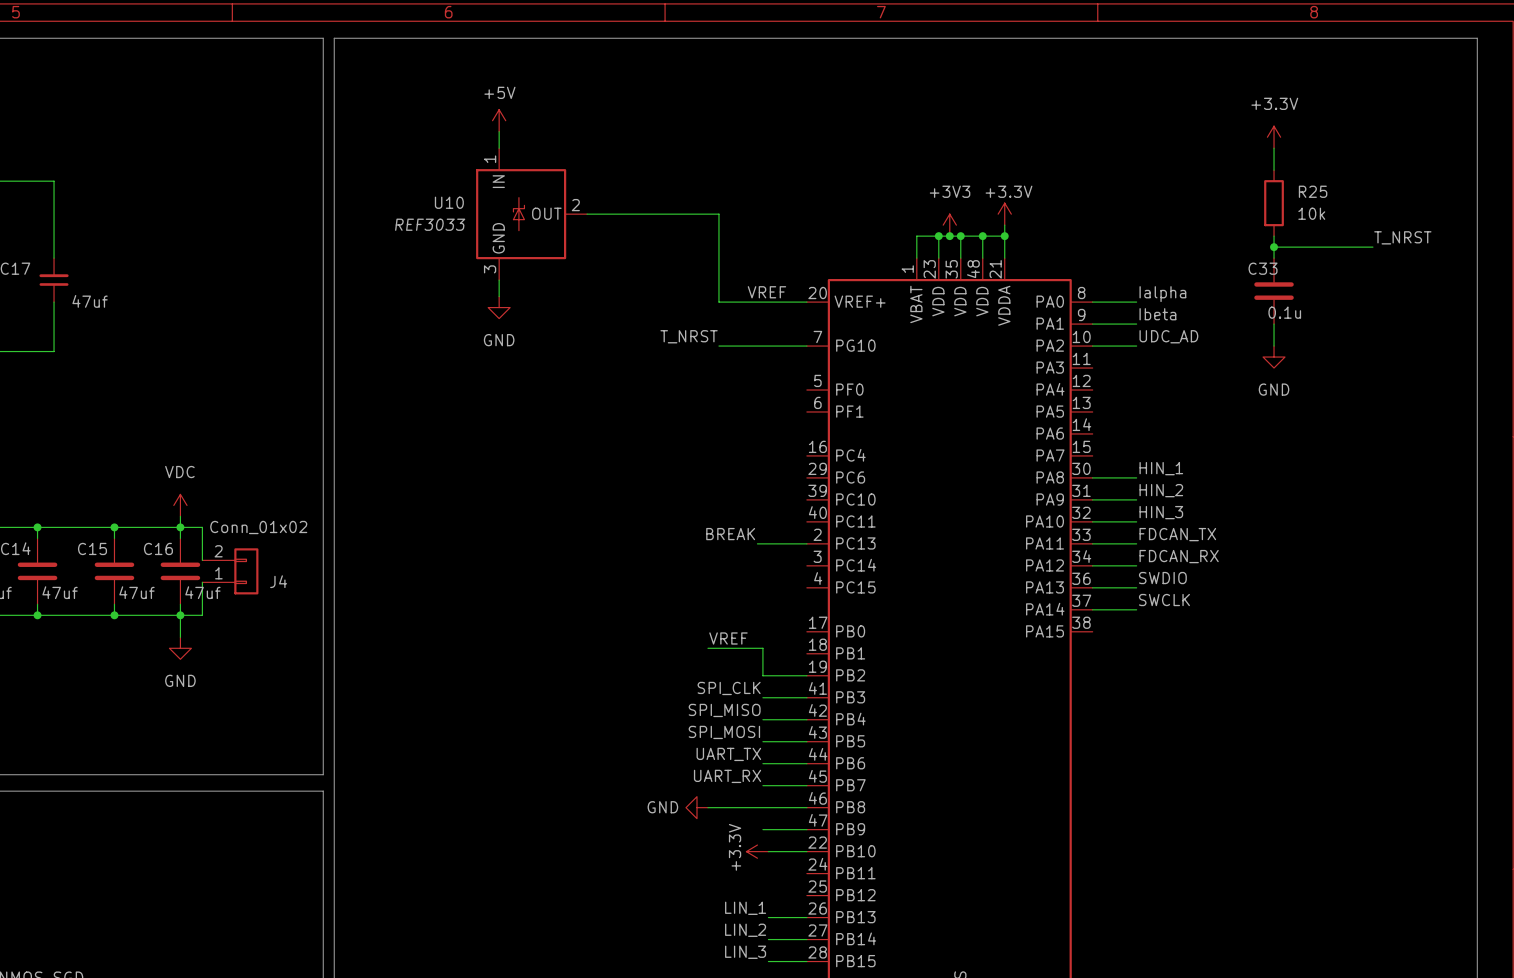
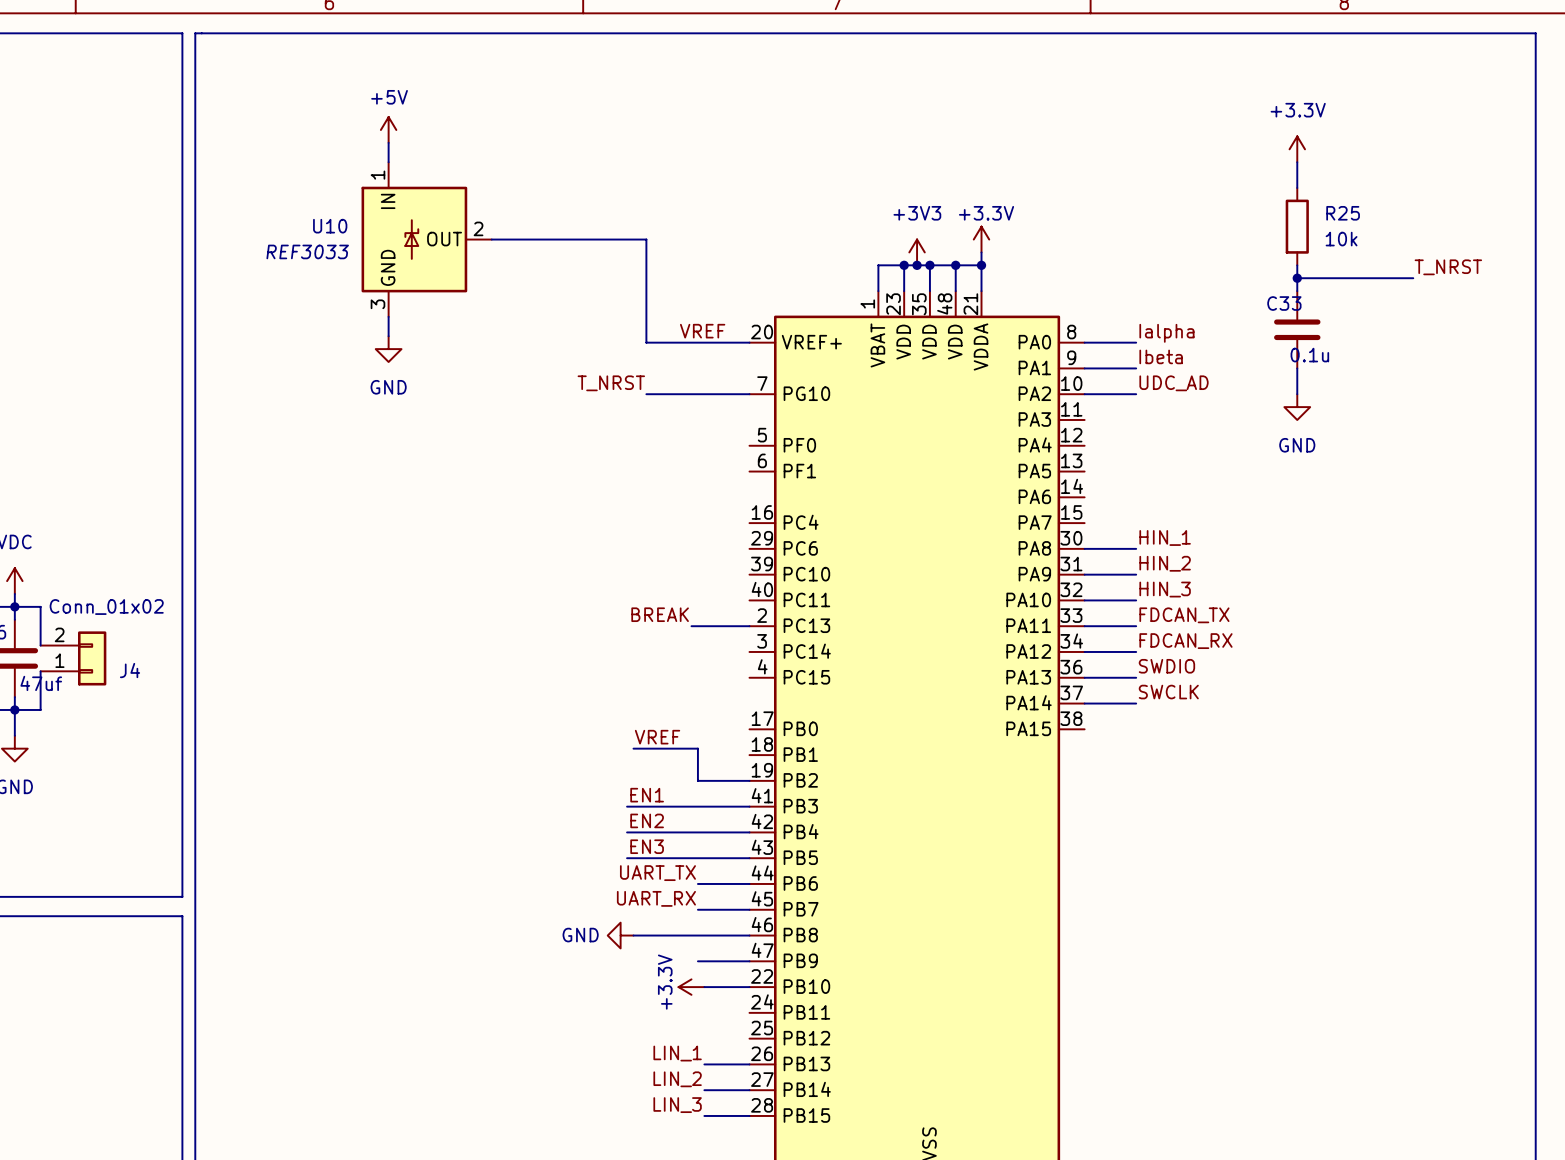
label: none -> EN1 (647, 795)
label: SPI_CLK (729, 688) -> none
wire: none -> (627, 806) (697, 806)
label: none -> EN2 (647, 820)
label: SPI_MISO (724, 710) -> none
wire: none -> (627, 832) (697, 832)
label: none -> EN3 (647, 846)
label: SPI_MOSI (724, 732) -> none
wire: none -> (627, 858) (697, 858)

